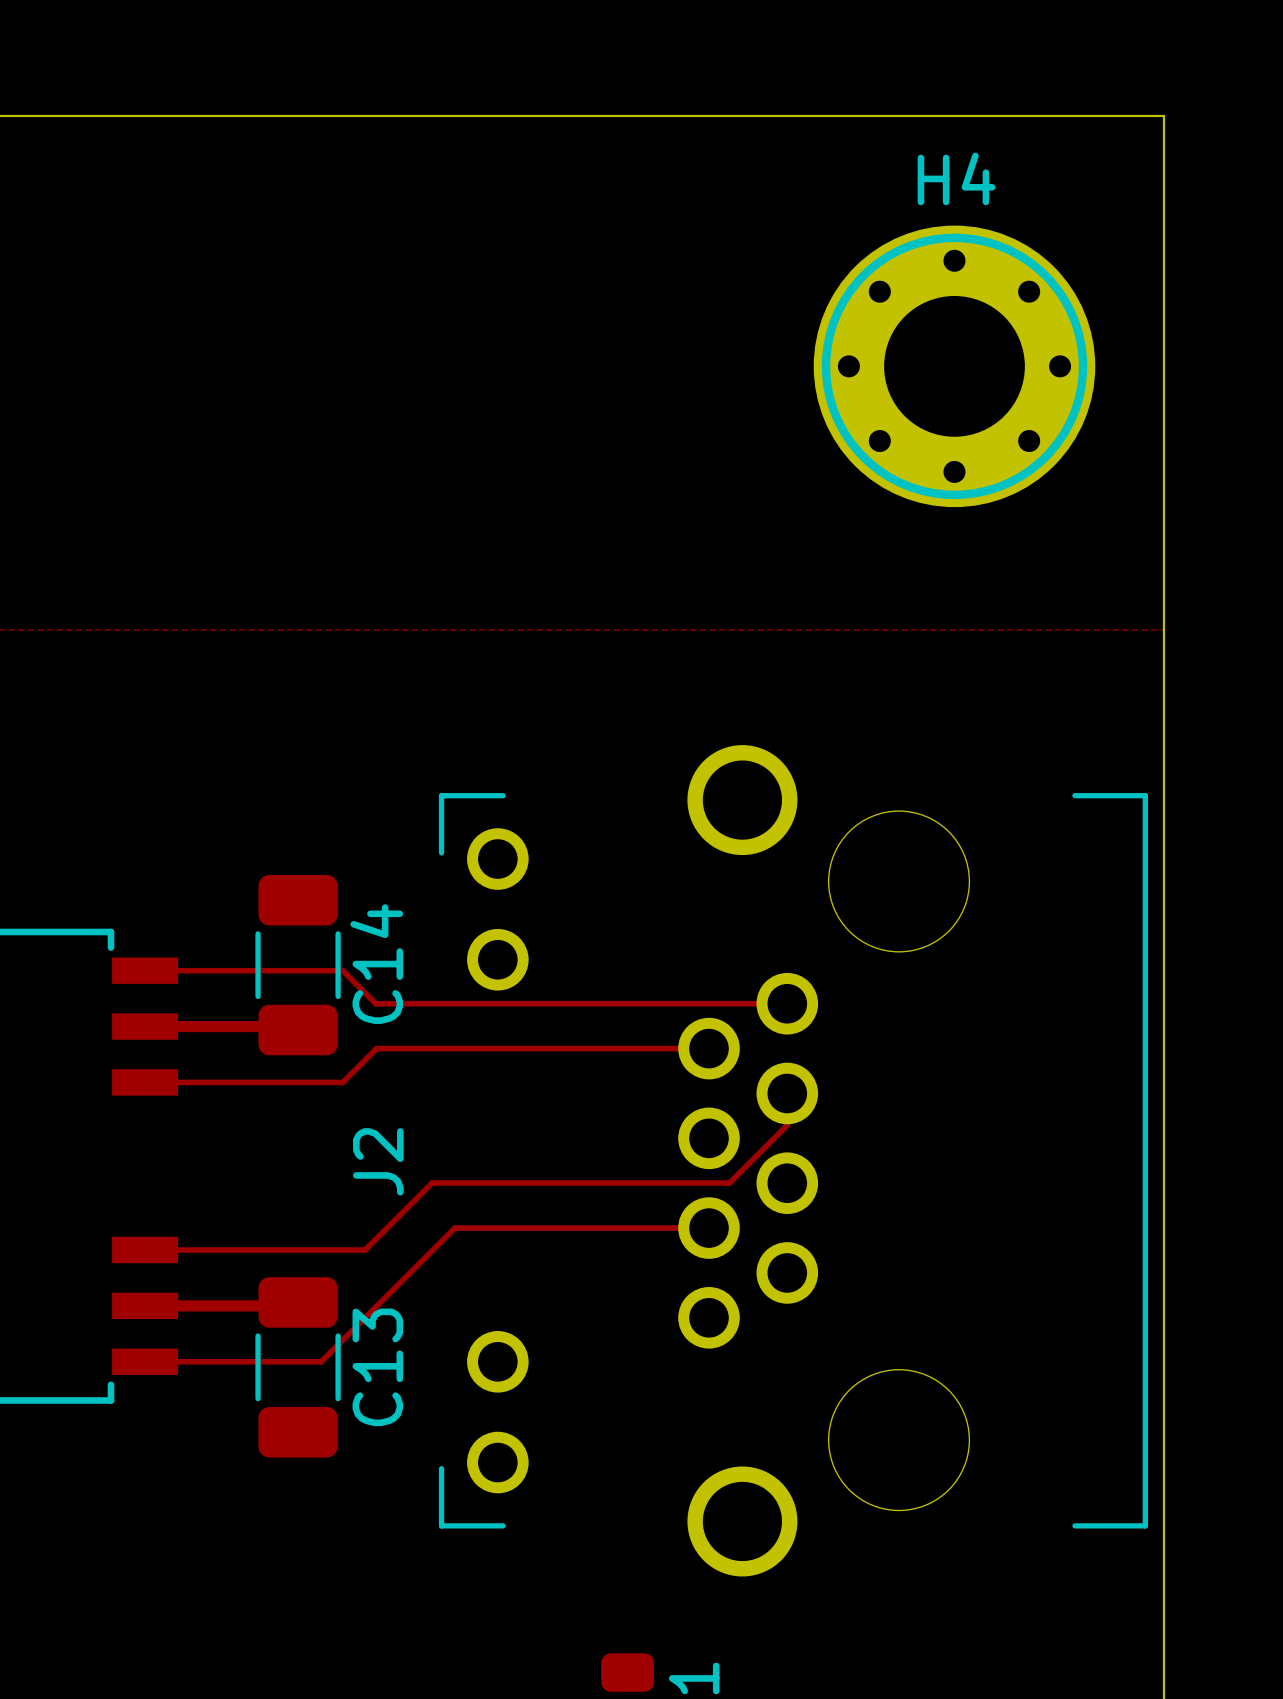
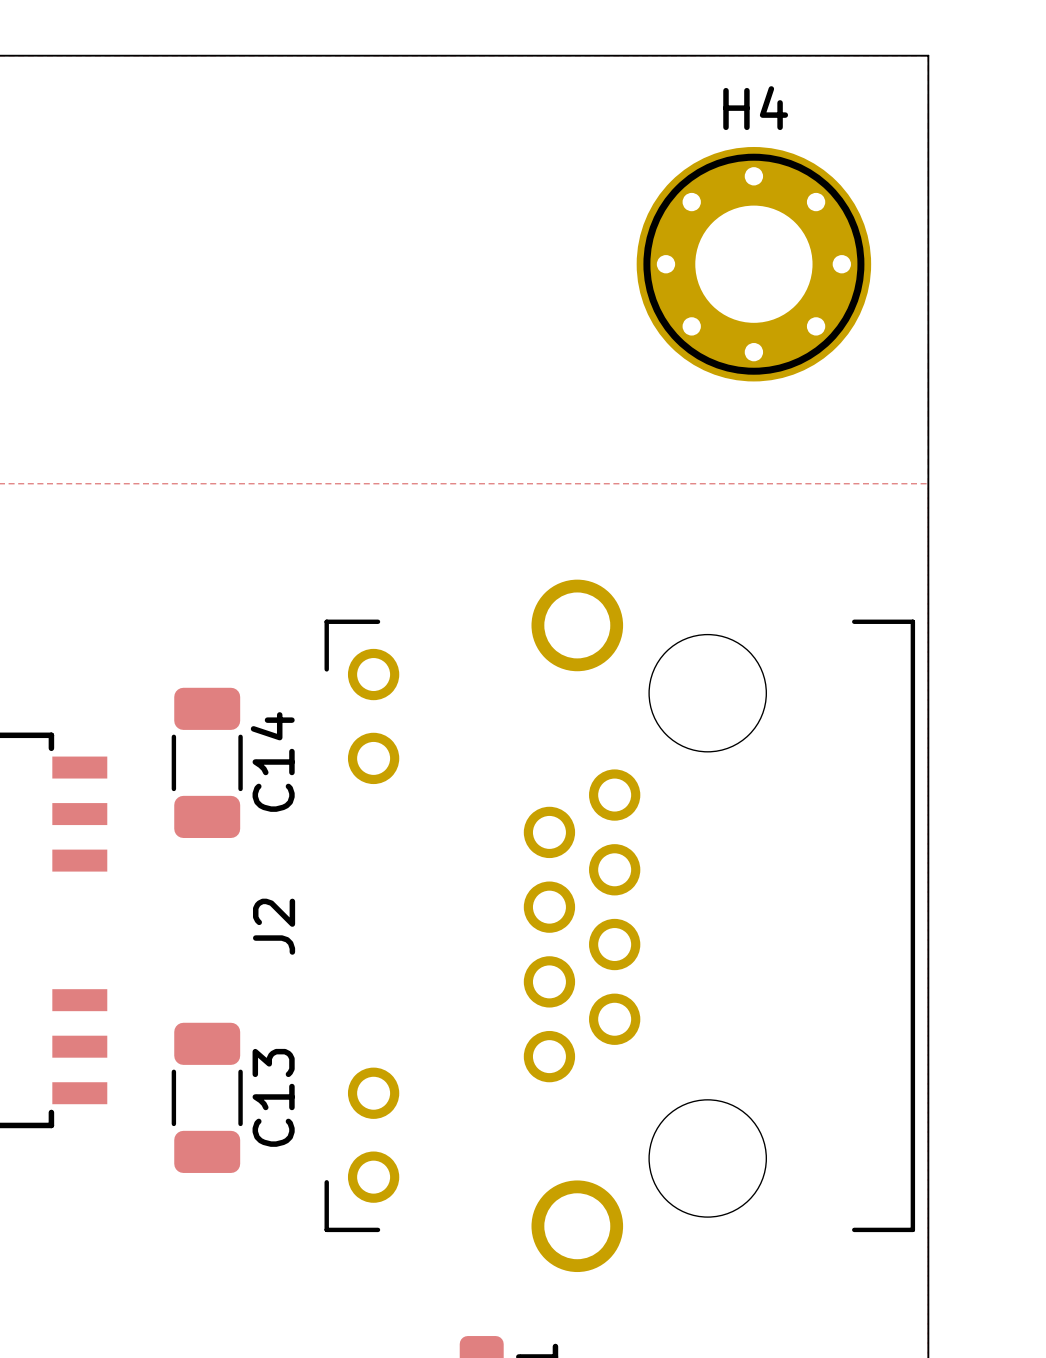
track: (145, 970) (342, 970) (375, 1003) (787, 1003) -> none
track: (145, 1026) (294, 1026) (298, 1030) -> none
track: (708, 1048) (376, 1048) (342, 1082) (145, 1082) -> none
track: (787, 1093) (787, 1125) (729, 1182) (432, 1182) (365, 1250) (145, 1250) -> none
track: (708, 1228) (454, 1228) (321, 1361) (145, 1361) -> none
track: (298, 1302) (294, 1305) (145, 1305) -> none

